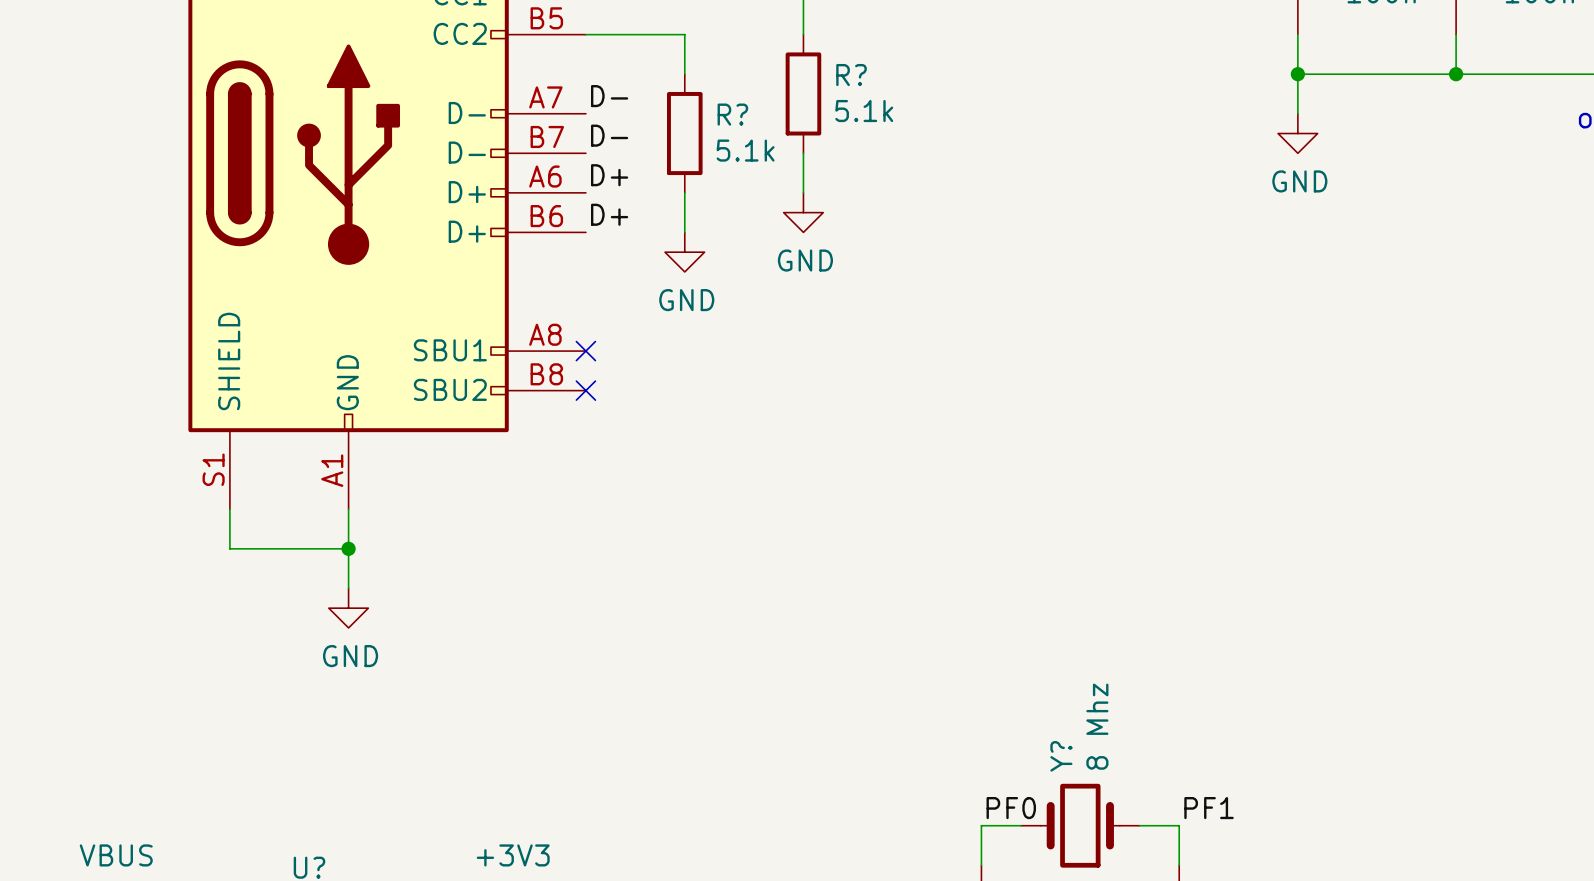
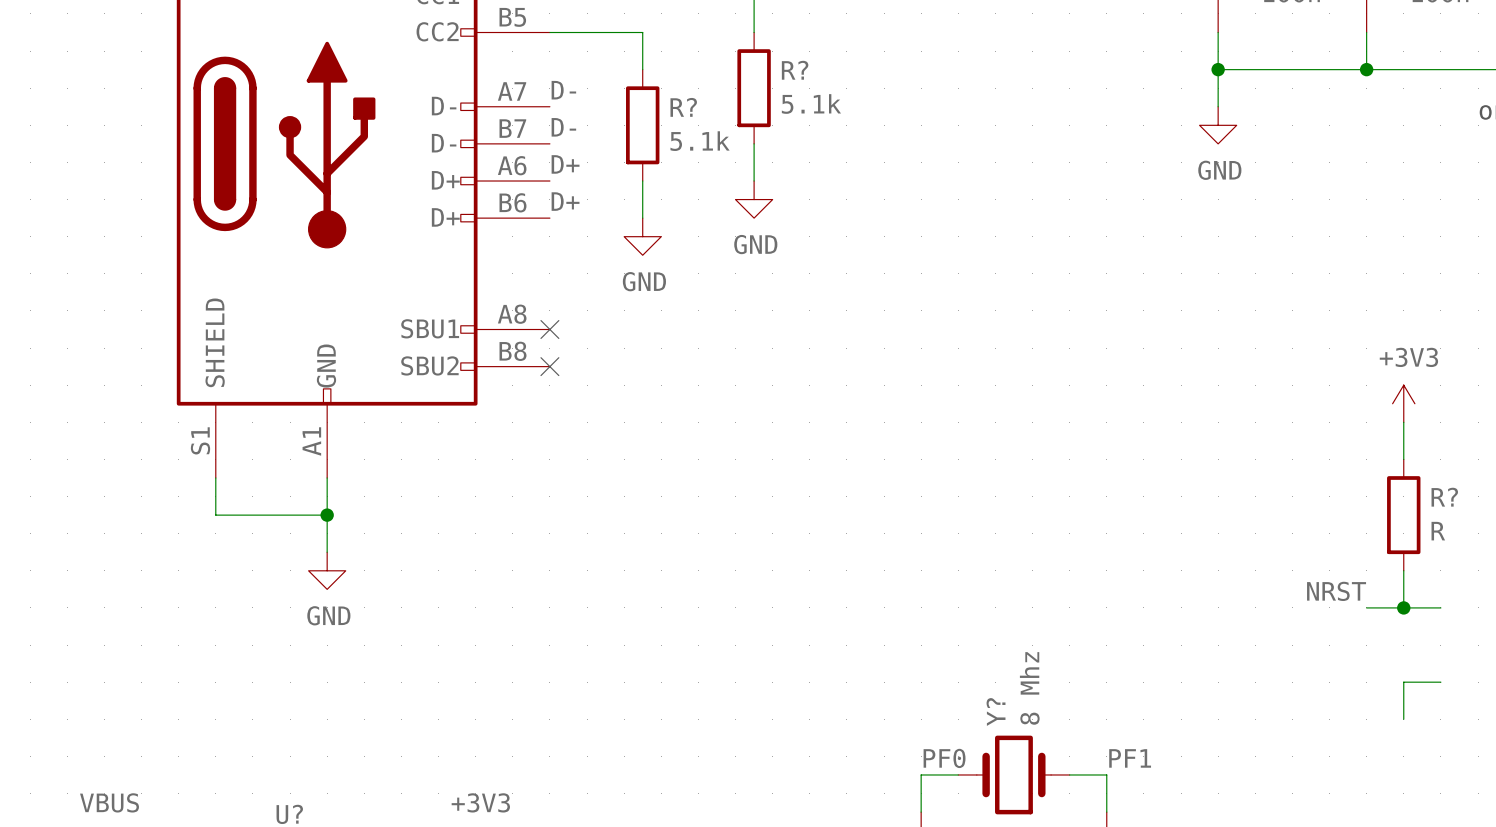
power symbol: none -> +3V3 (1403, 403)
wire: none -> (1403, 422) (1403, 459)
R?: none -> R (1403, 515)
wire: none -> (1403, 570) (1403, 607)
label: none -> NRST (1336, 591)
wire: none -> (1366, 607) (1440, 607)
junction: none -> (1403, 607)
wire: none -> (1440, 682) (1403, 682) (1403, 719)

